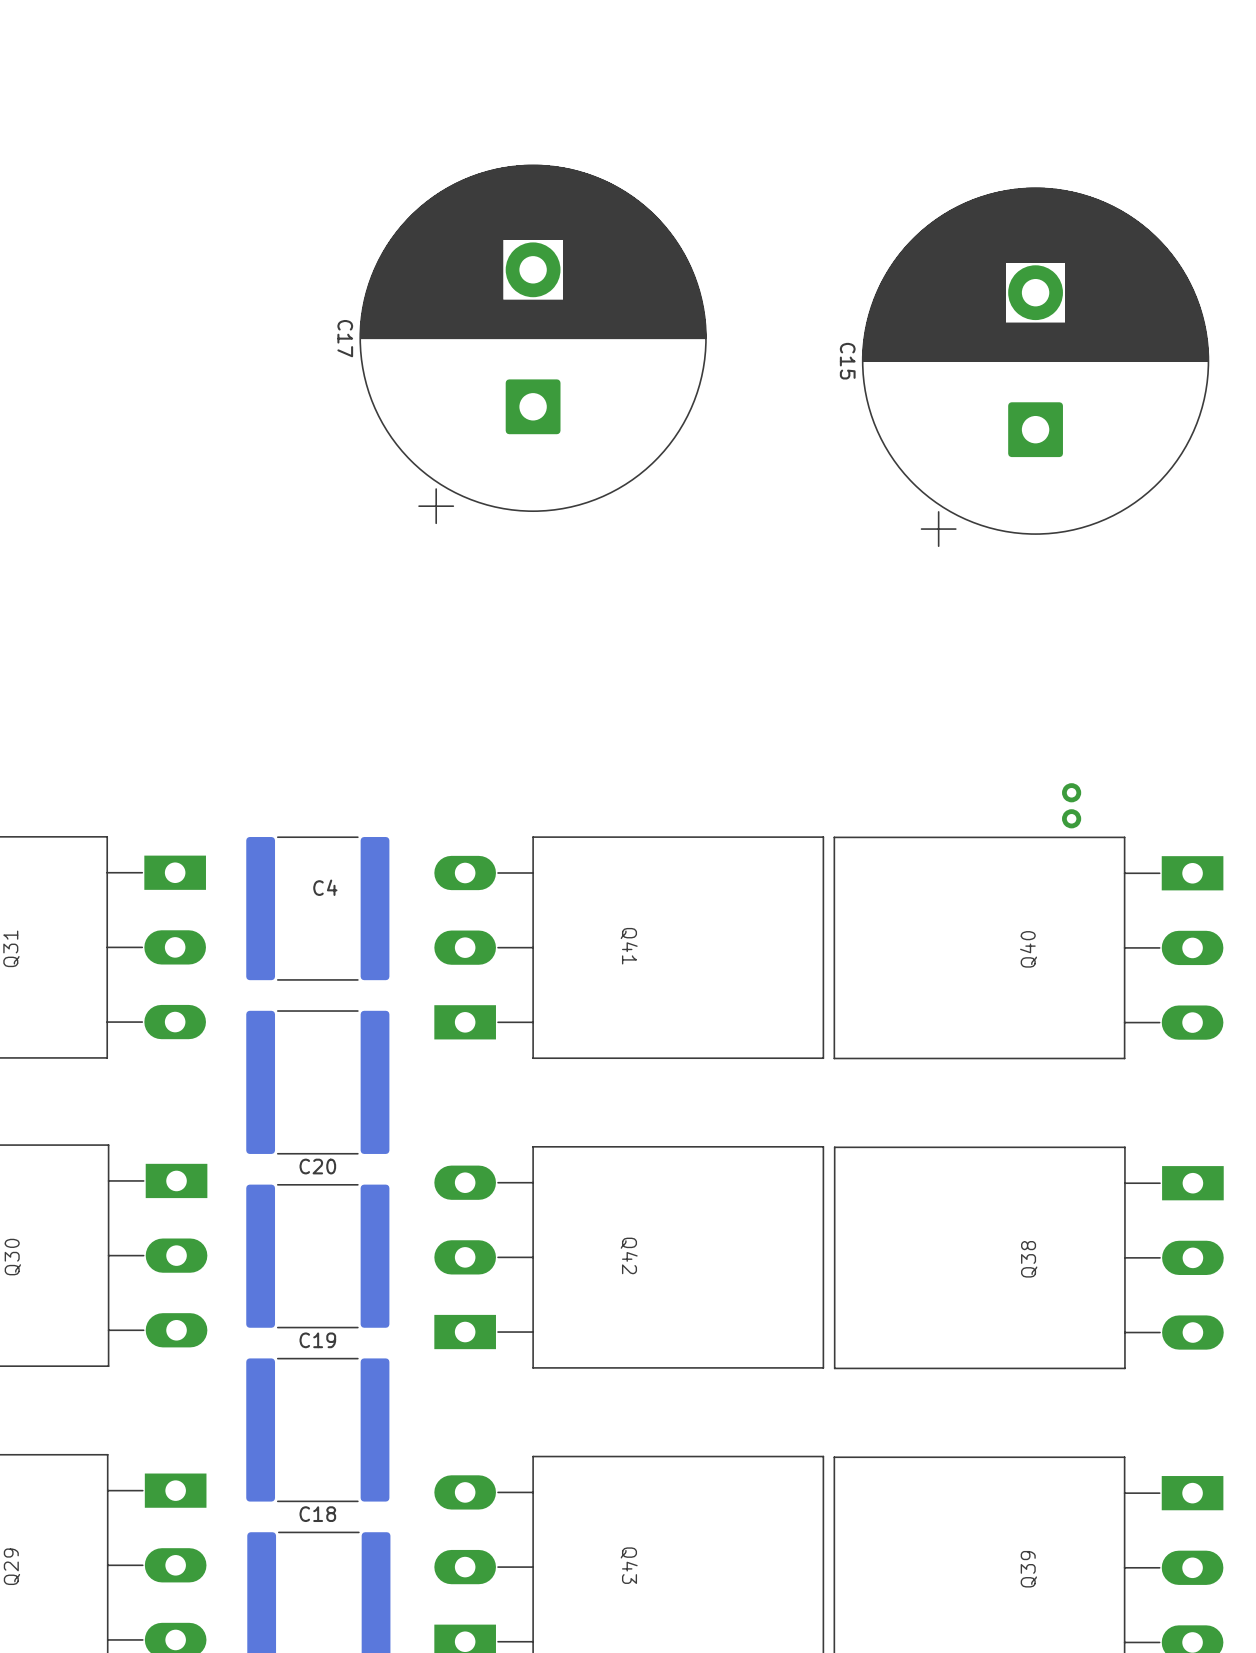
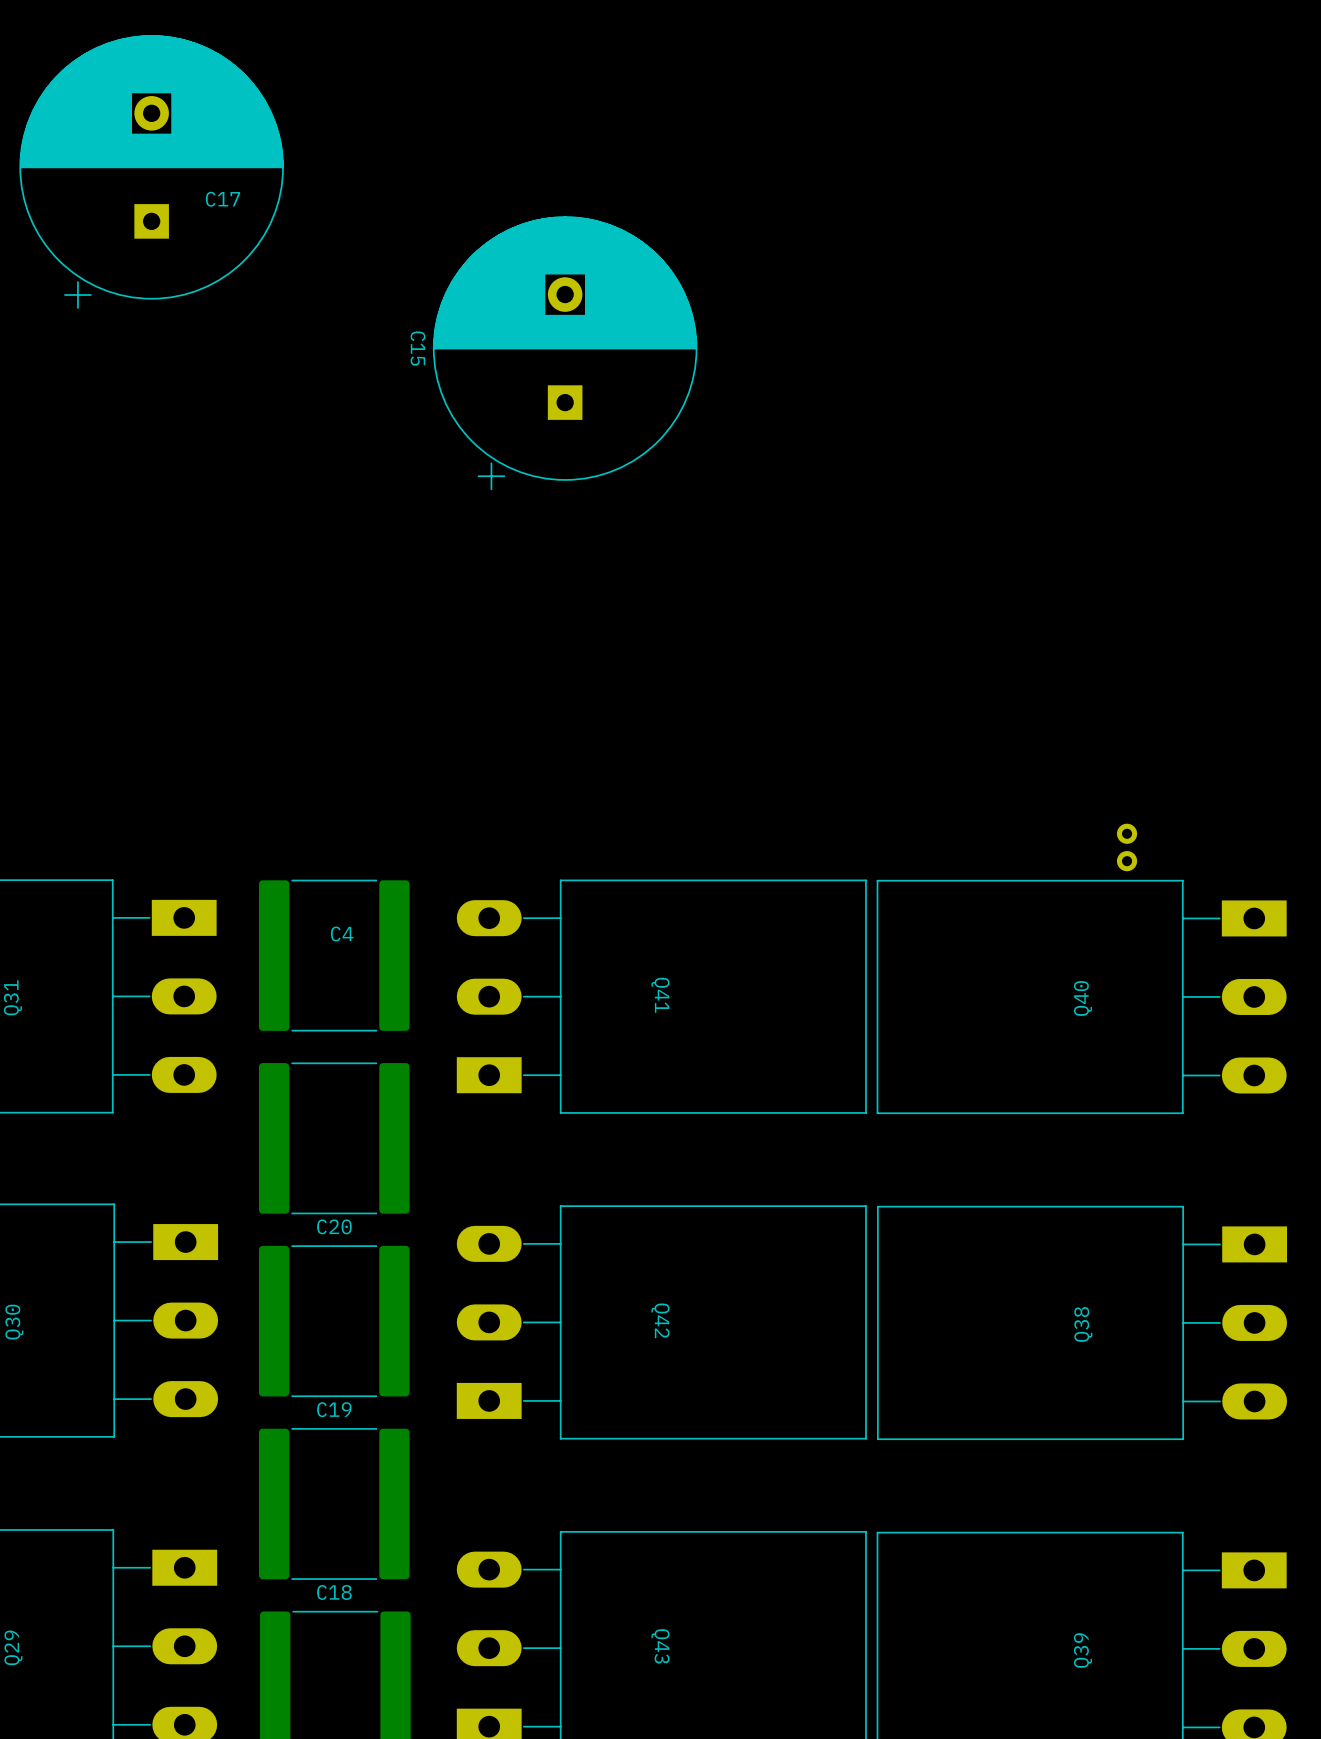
C17 footprint: [359, 164, 707, 525] -> [19, 35, 284, 309]
C15 footprint: [861, 187, 1210, 547] -> [432, 216, 698, 491]
C17 name position: C17 (345, 338) -> C17 (222, 199)
C15 name position: C15 (847, 361) -> C15 (418, 348)

